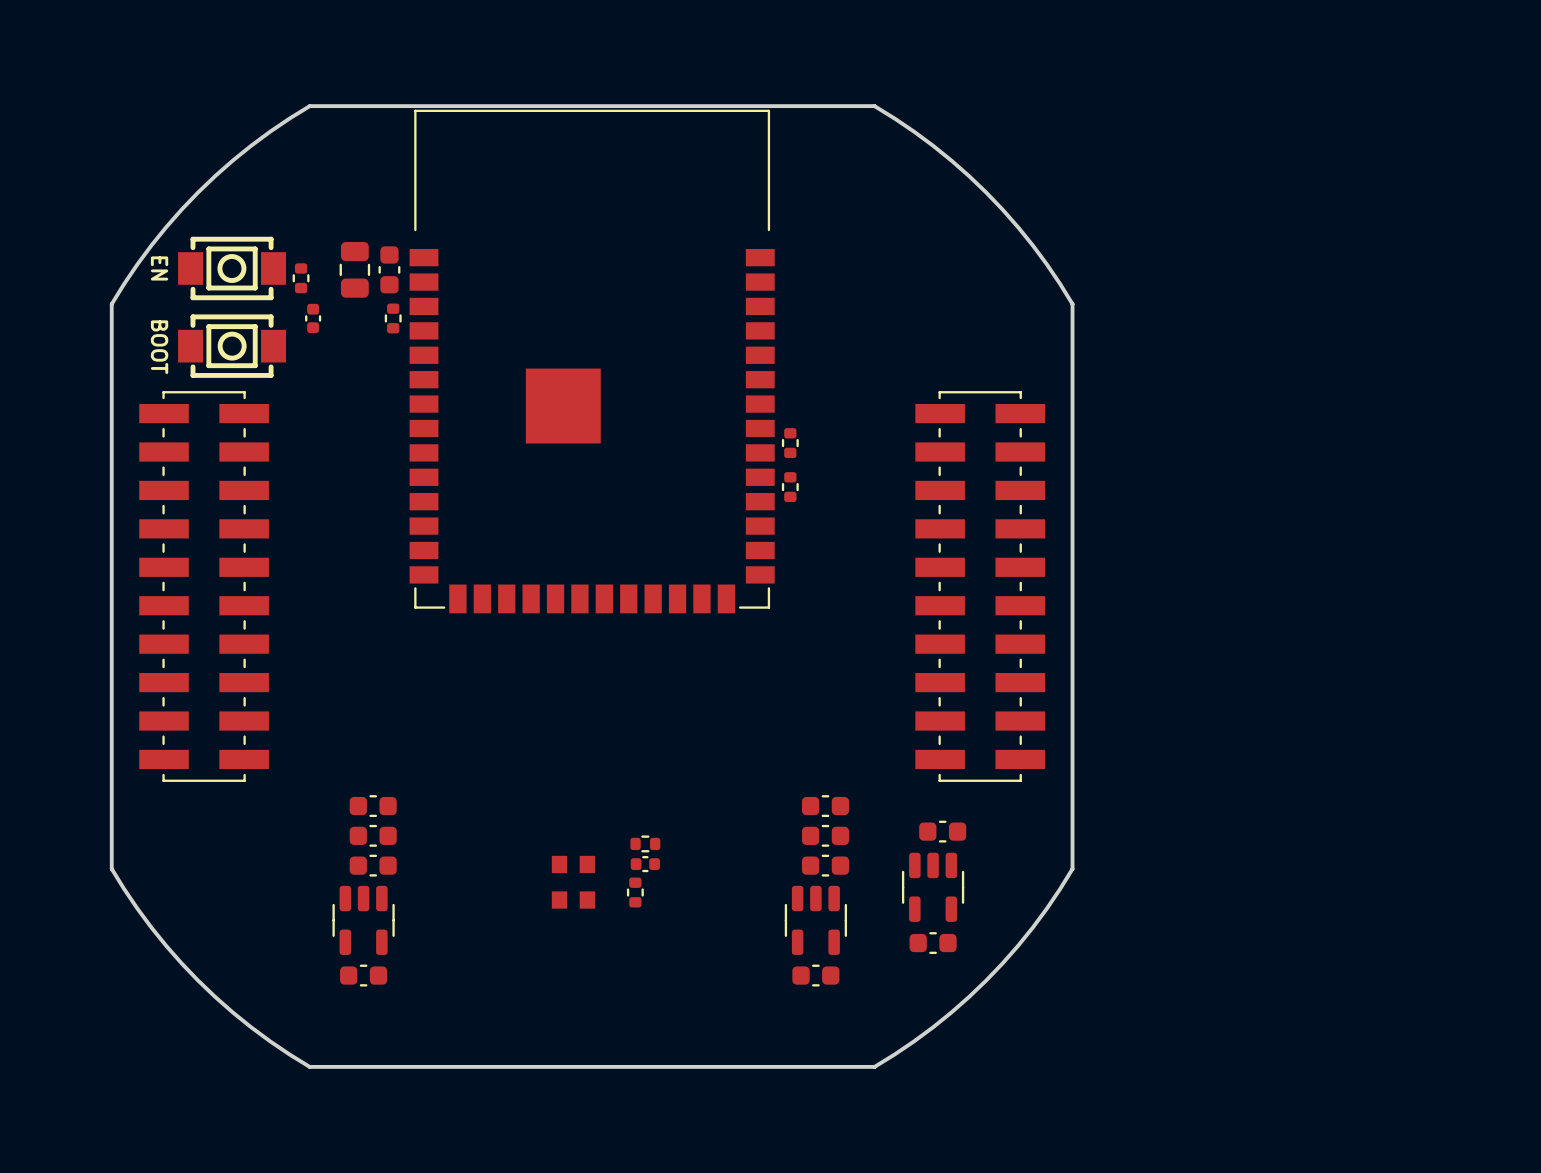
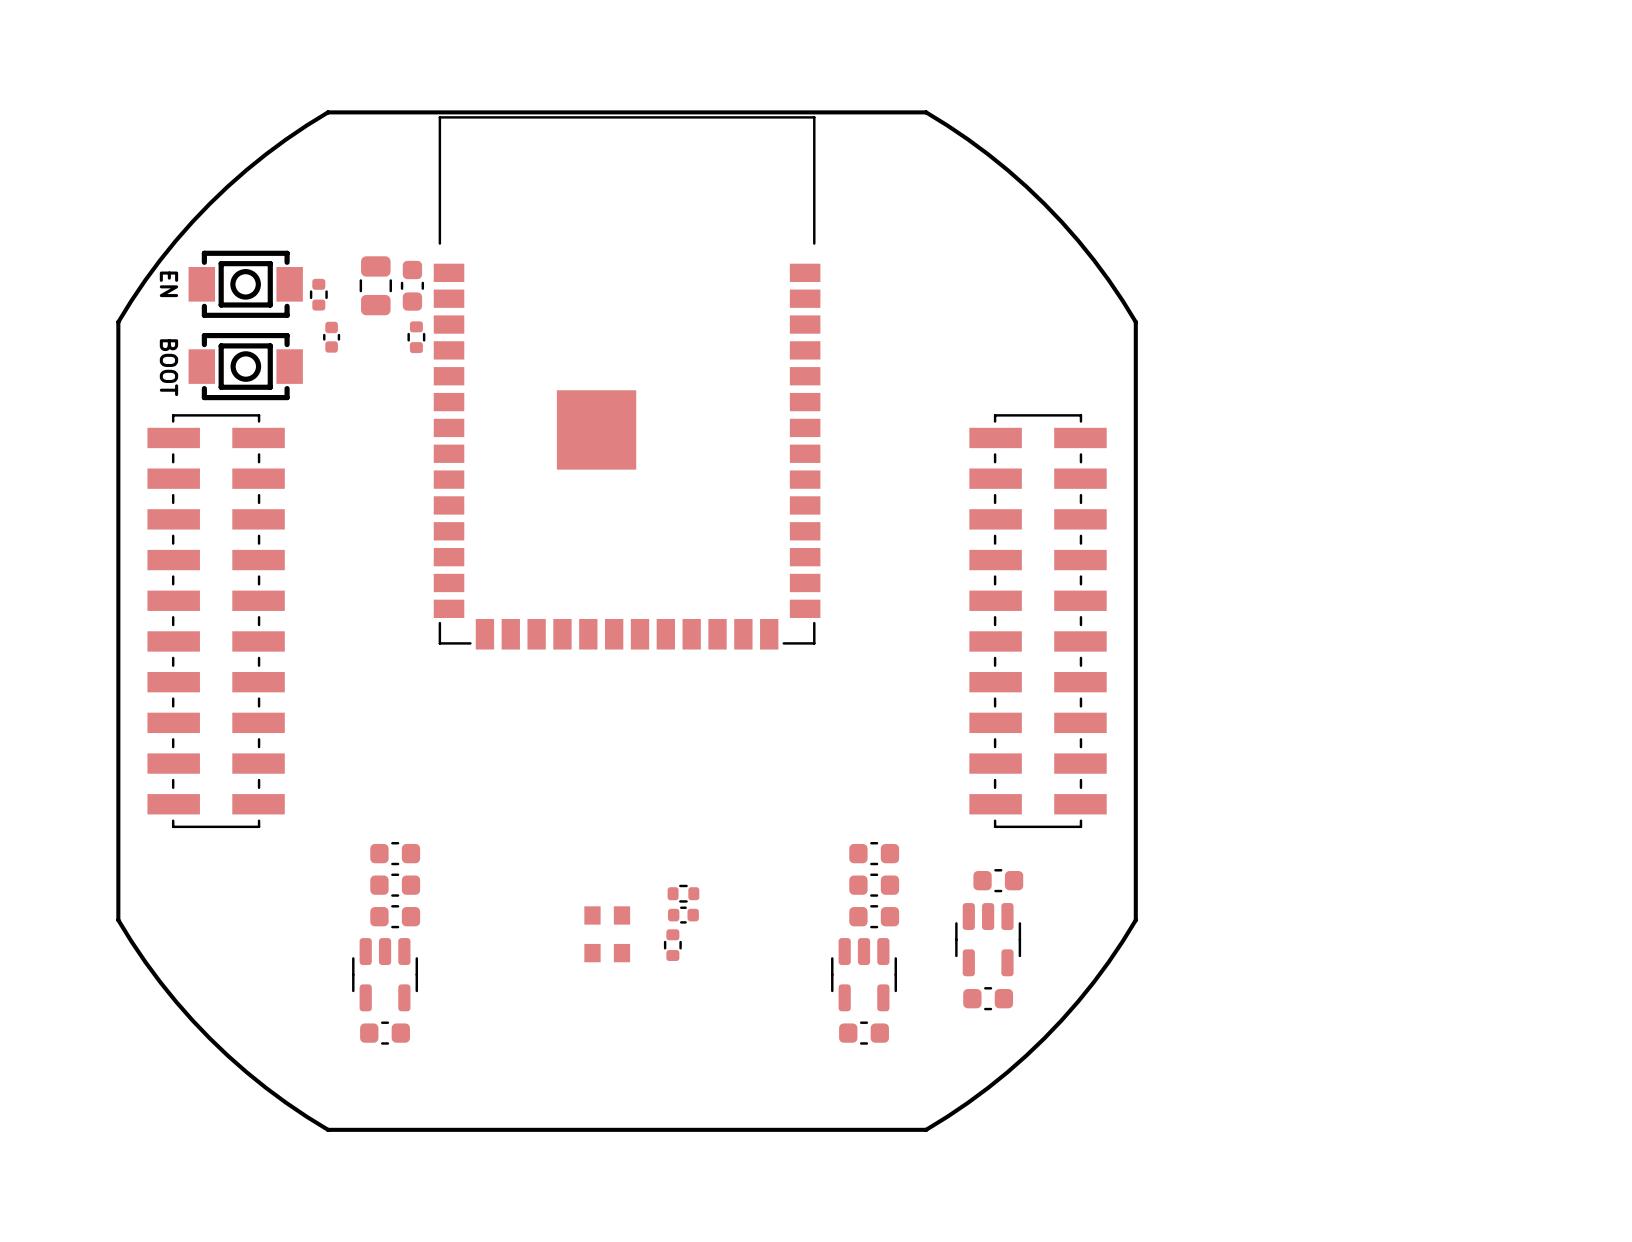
part: (790, 443) -> none
part: (790, 487) -> none

